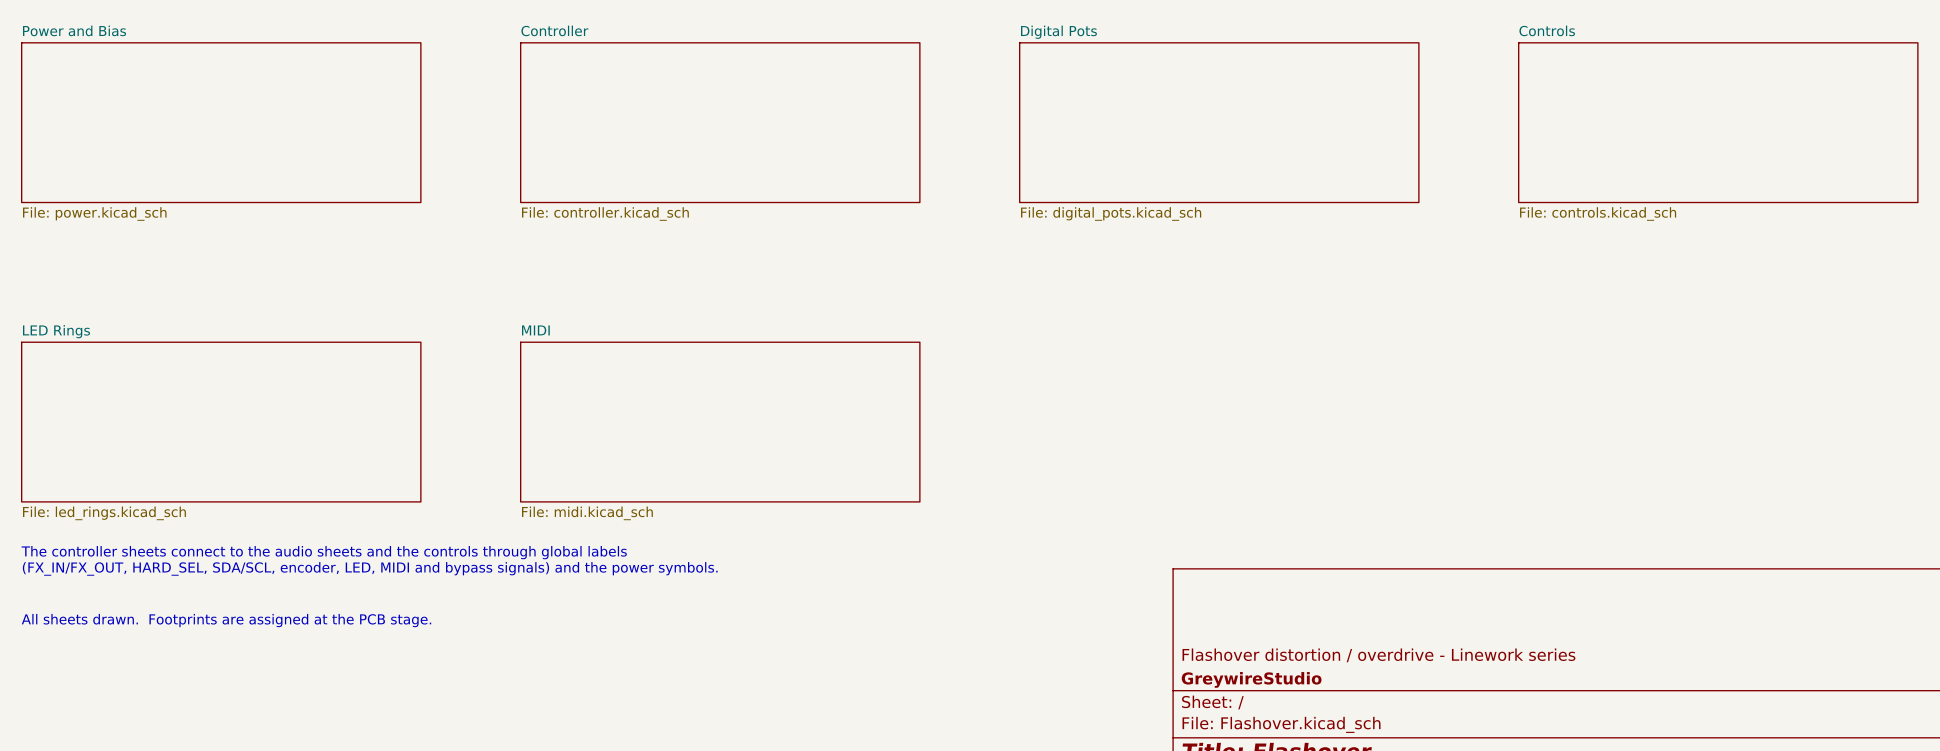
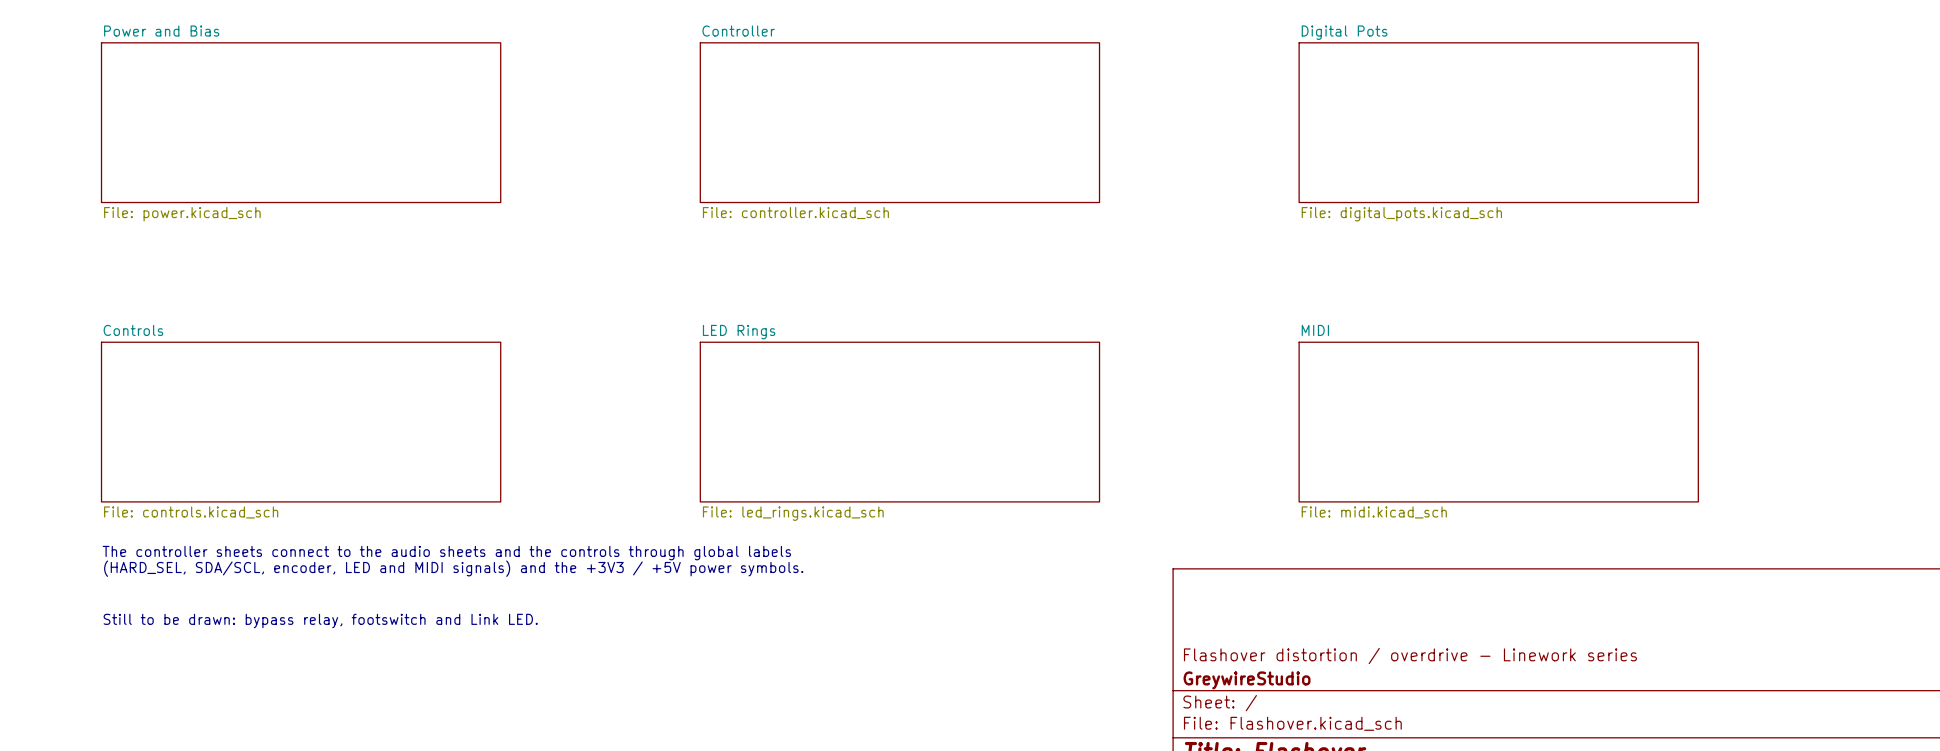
sheet Power and Bias position: (221, 122) -> (301, 122)
sheet Controller position: (720, 122) -> (899, 122)
sheet Digital Pots: File: digital_pots.kicad_sch (1219, 122) -> none
sheet Digital Pots: none -> File: digital_pots.kicad_sch (1498, 122)
sheet Controls: File: controls.kicad_sch (1718, 122) -> none
sheet LED Rings: File: led_rings.kicad_sch (221, 422) -> none
sheet Controls: none -> File: controls.kicad_sch (301, 422)
sheet MIDI: File: midi.kicad_sch (720, 422) -> none
sheet LED Rings: none -> File: led_rings.kicad_sch (899, 422)
sheet MIDI: none -> File: midi.kicad_sch (1498, 422)
text position: The controller sheets connect to the audio sheets and the controls through global labels (324, 552) -> The controller sheets connect to the audio sheets and the controls through global labels (446, 553)
text: (FX_IN/FX_OUT, HARD_SEL, SDA/SCL, encoder, LED, MIDI and bypass signals) and the power symbols. (370, 568) -> (HARD_SEL, SDA/SCL, encoder, LED and MIDI signals) and the +3V3 / +5V power symbols. (453, 568)
text: All sheets drawn. Footprints are assigned at the PCB stage. (226, 620) -> none
text: none -> Still to be drawn: bypass relay, footswitch and Link LED. (320, 621)

